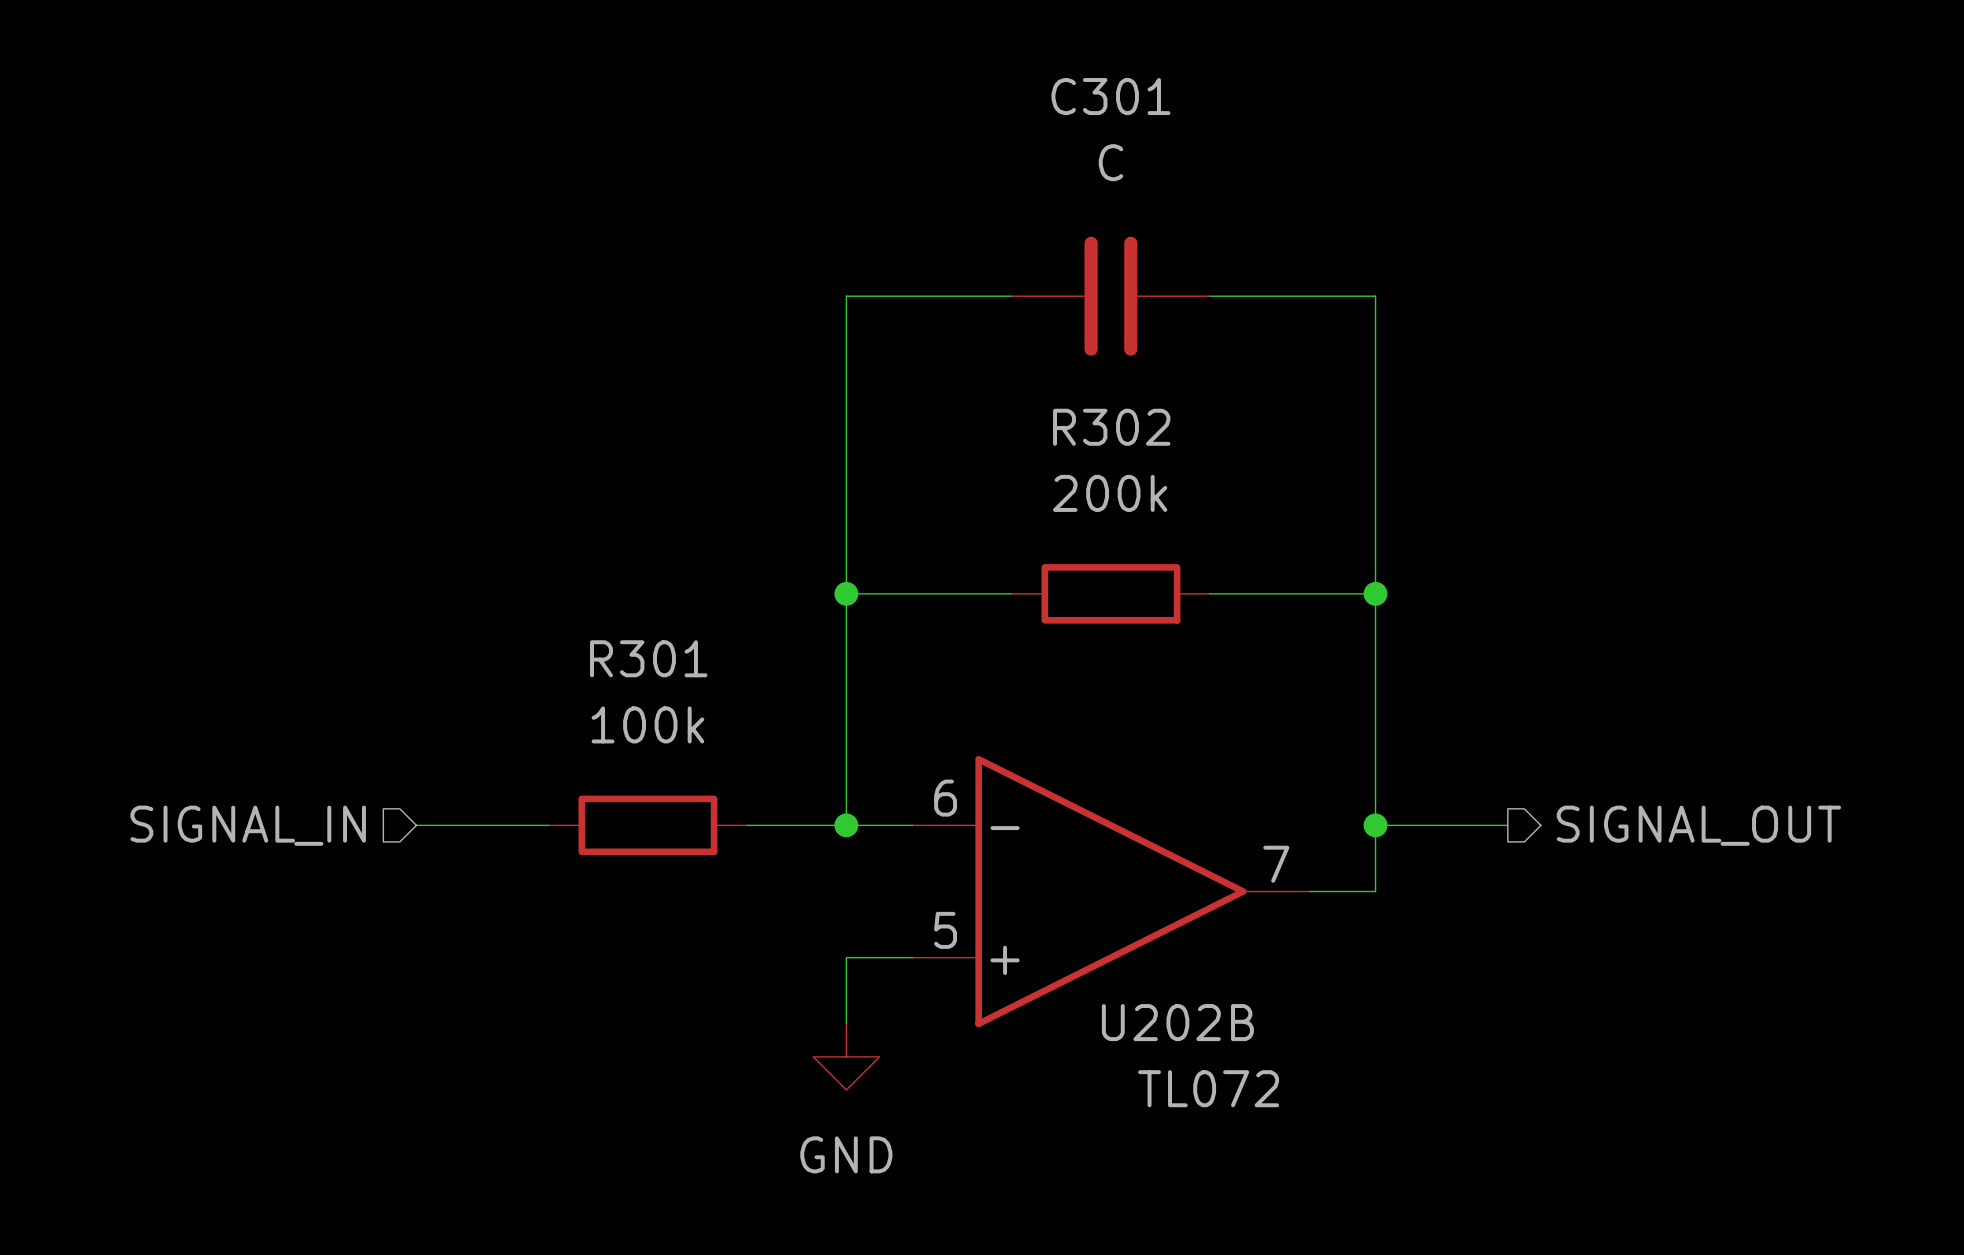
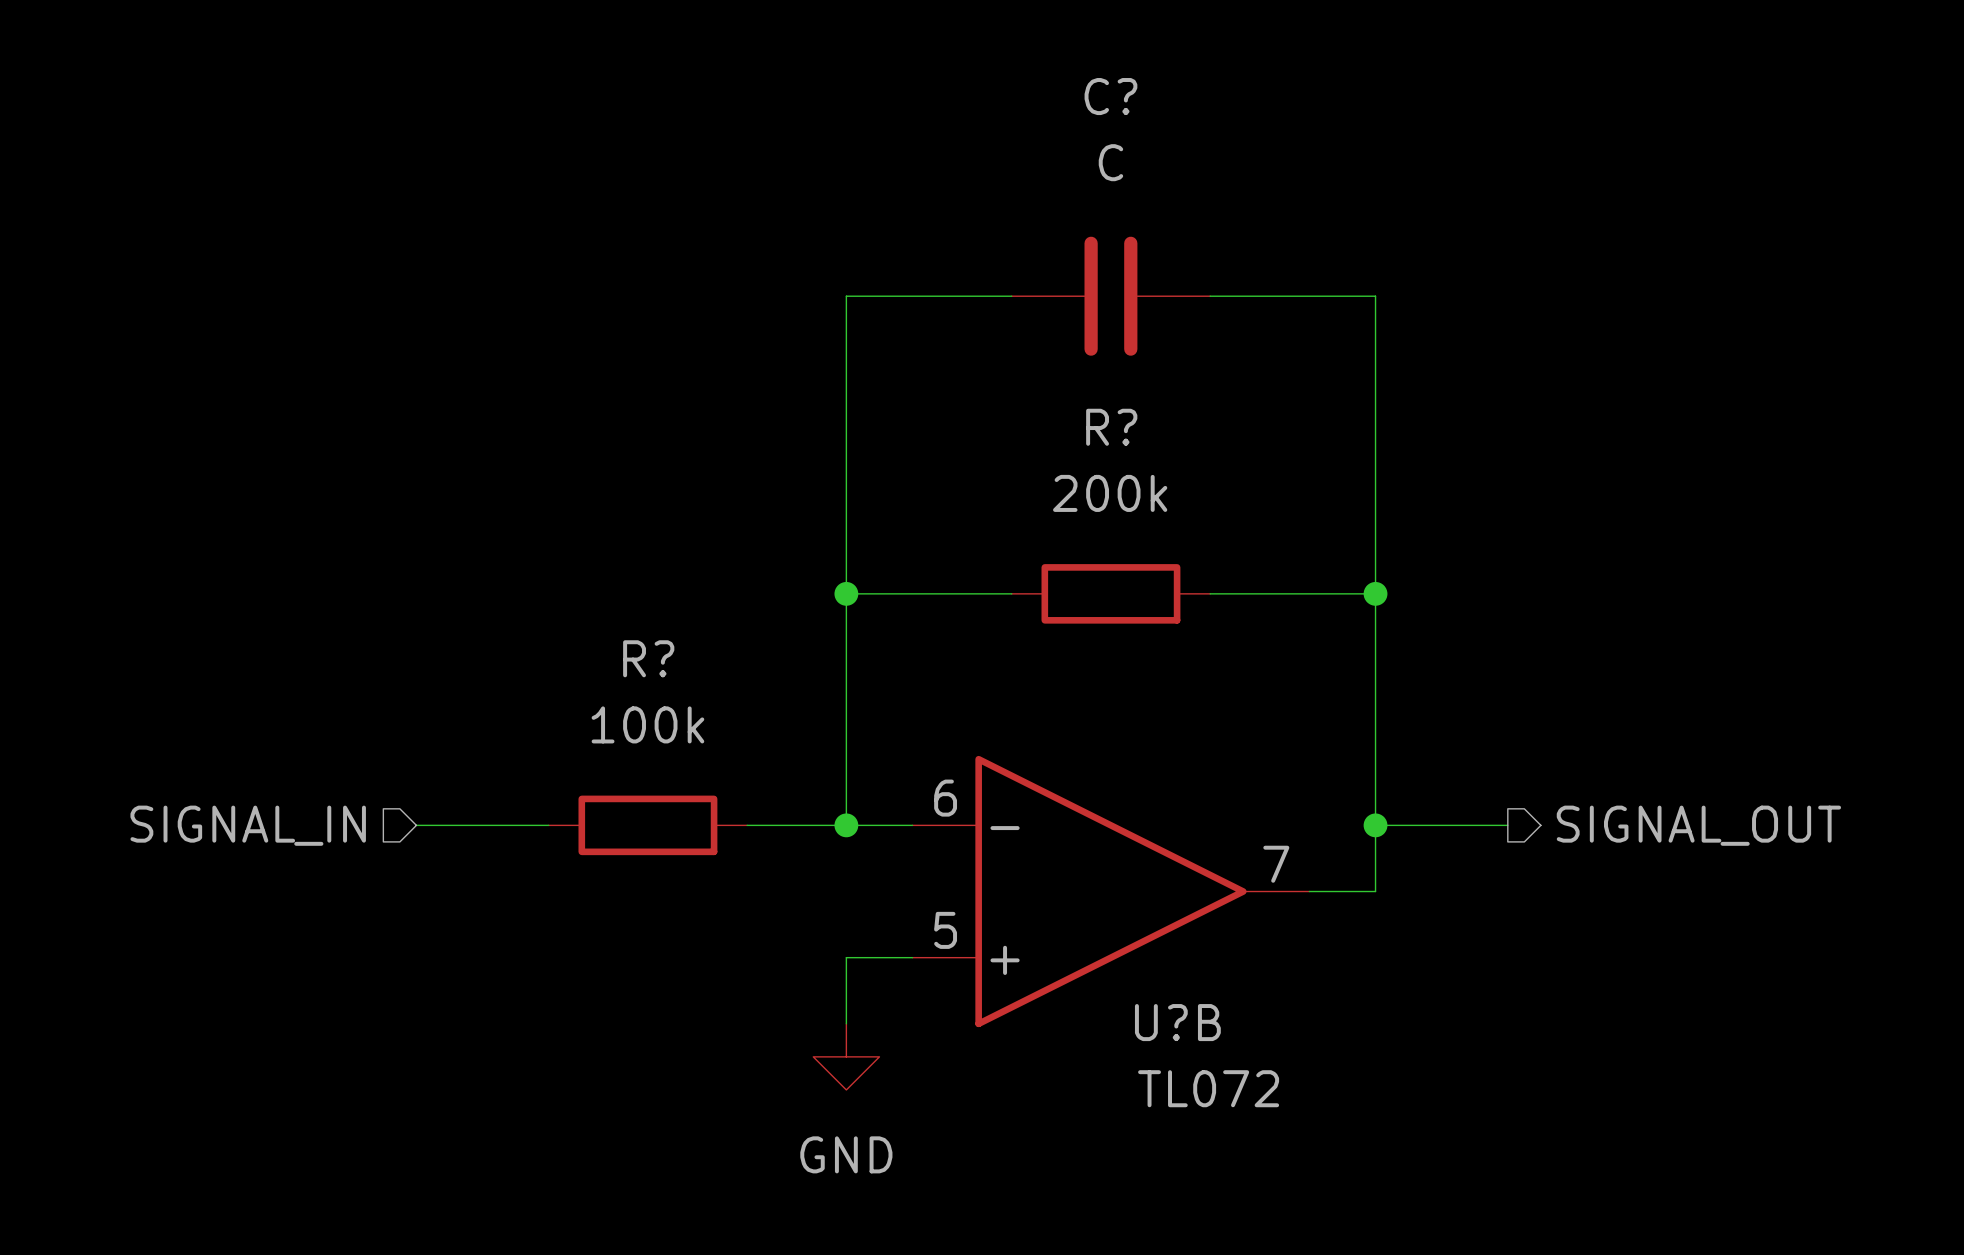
C301 name: C301 (1110, 96) -> C? (1110, 96)
R302 name: R302 (1111, 427) -> R? (1111, 427)
R301 name: R301 (648, 658) -> R? (648, 658)
U202B name: U202B (1177, 1022) -> U?B (1177, 1022)

